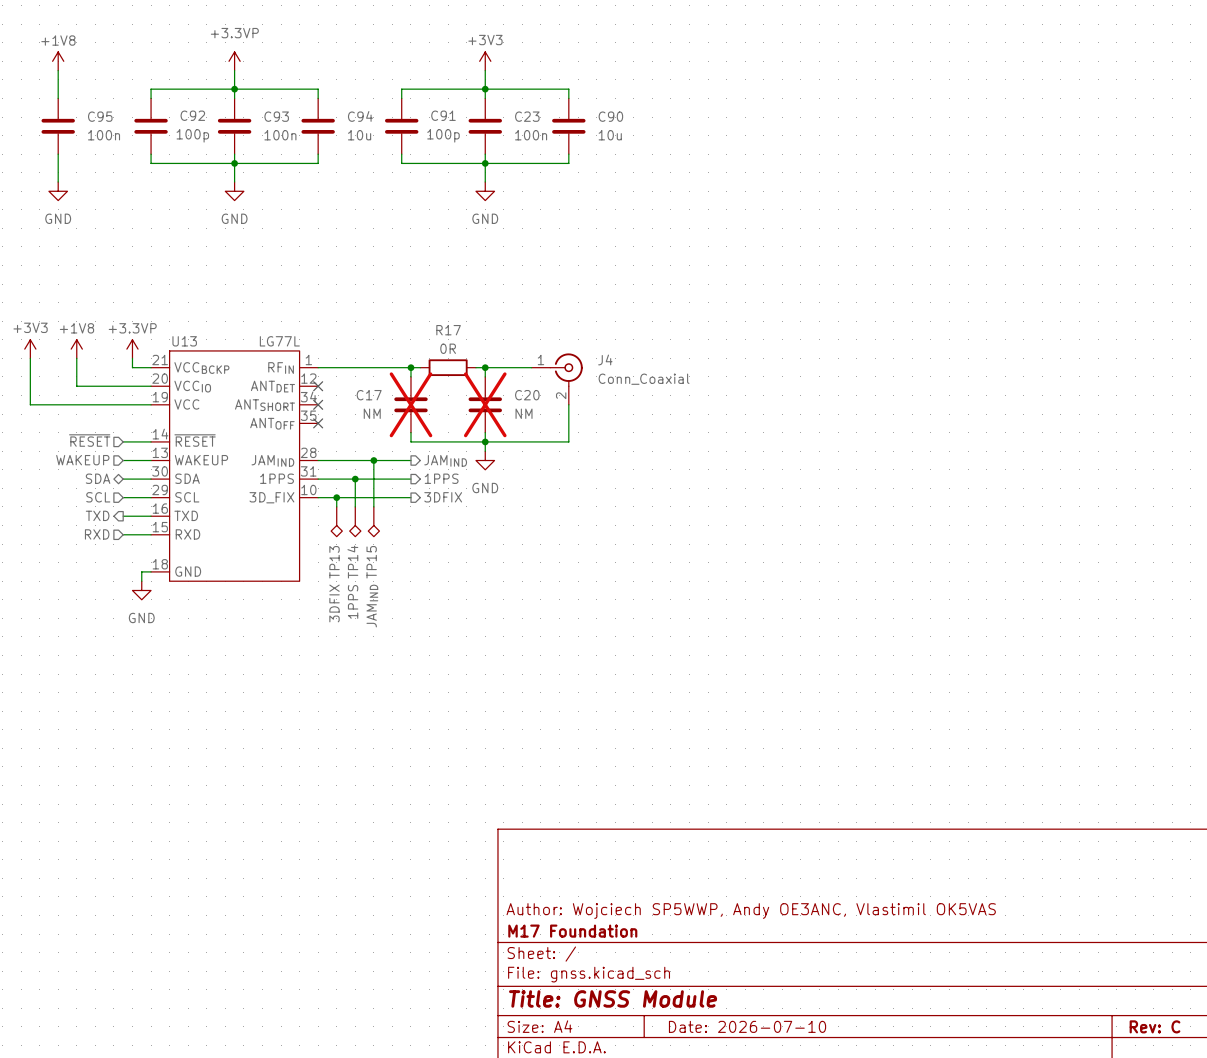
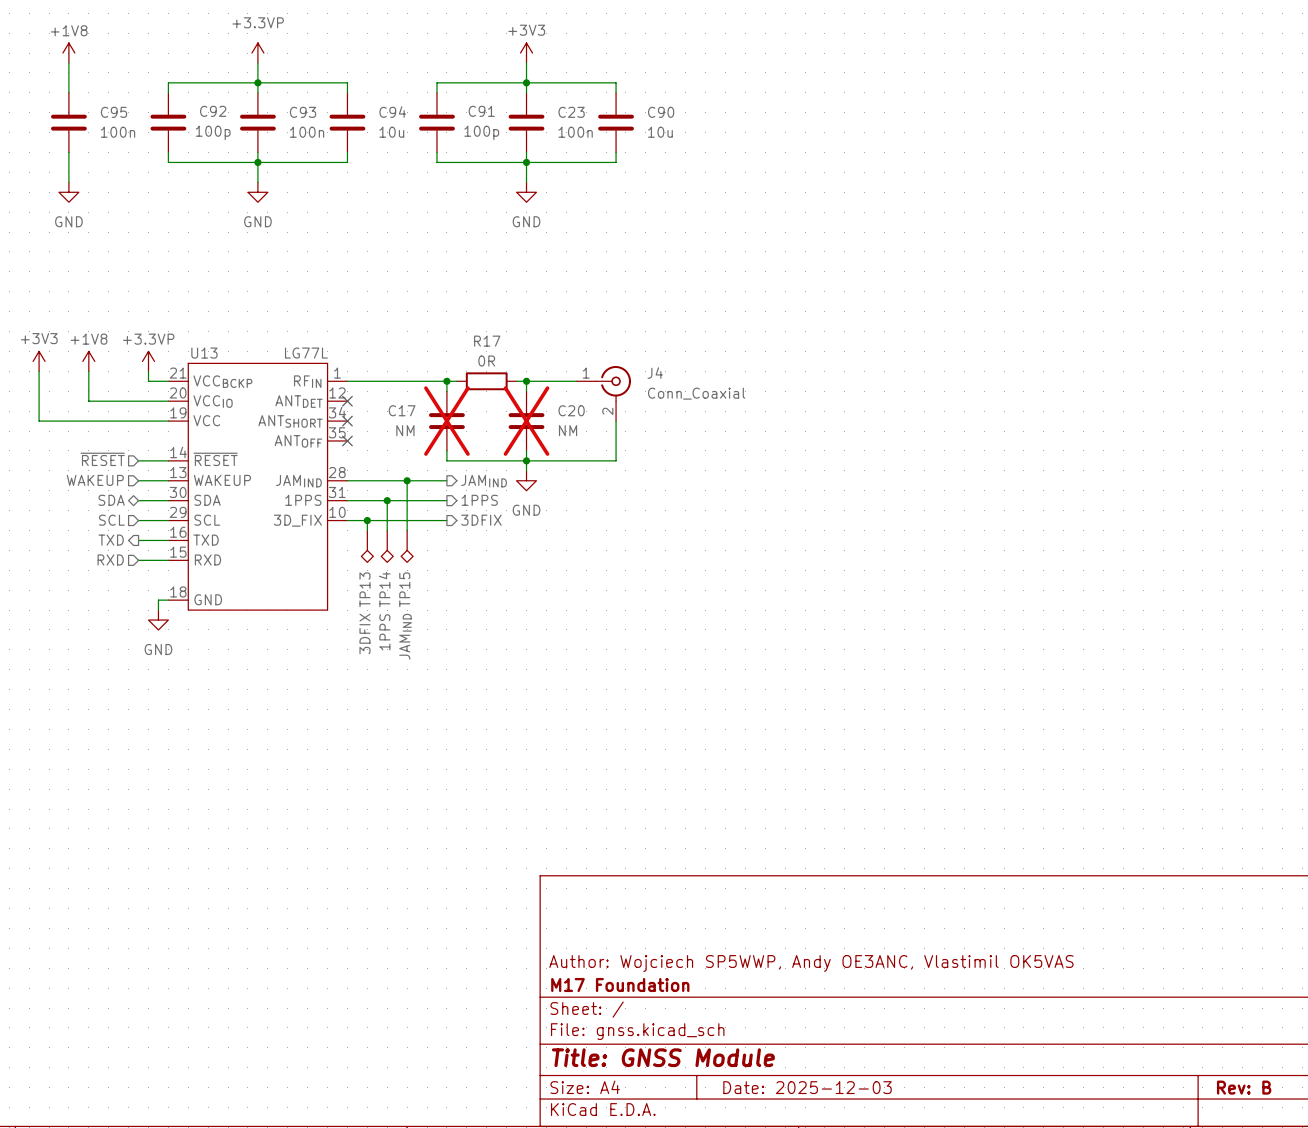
title block: Date: 2026-07-10 (747, 1026) -> Date: 2025-12-03 (807, 1087)
title block: Rev: C (1155, 1026) -> Rev: B (1244, 1087)

